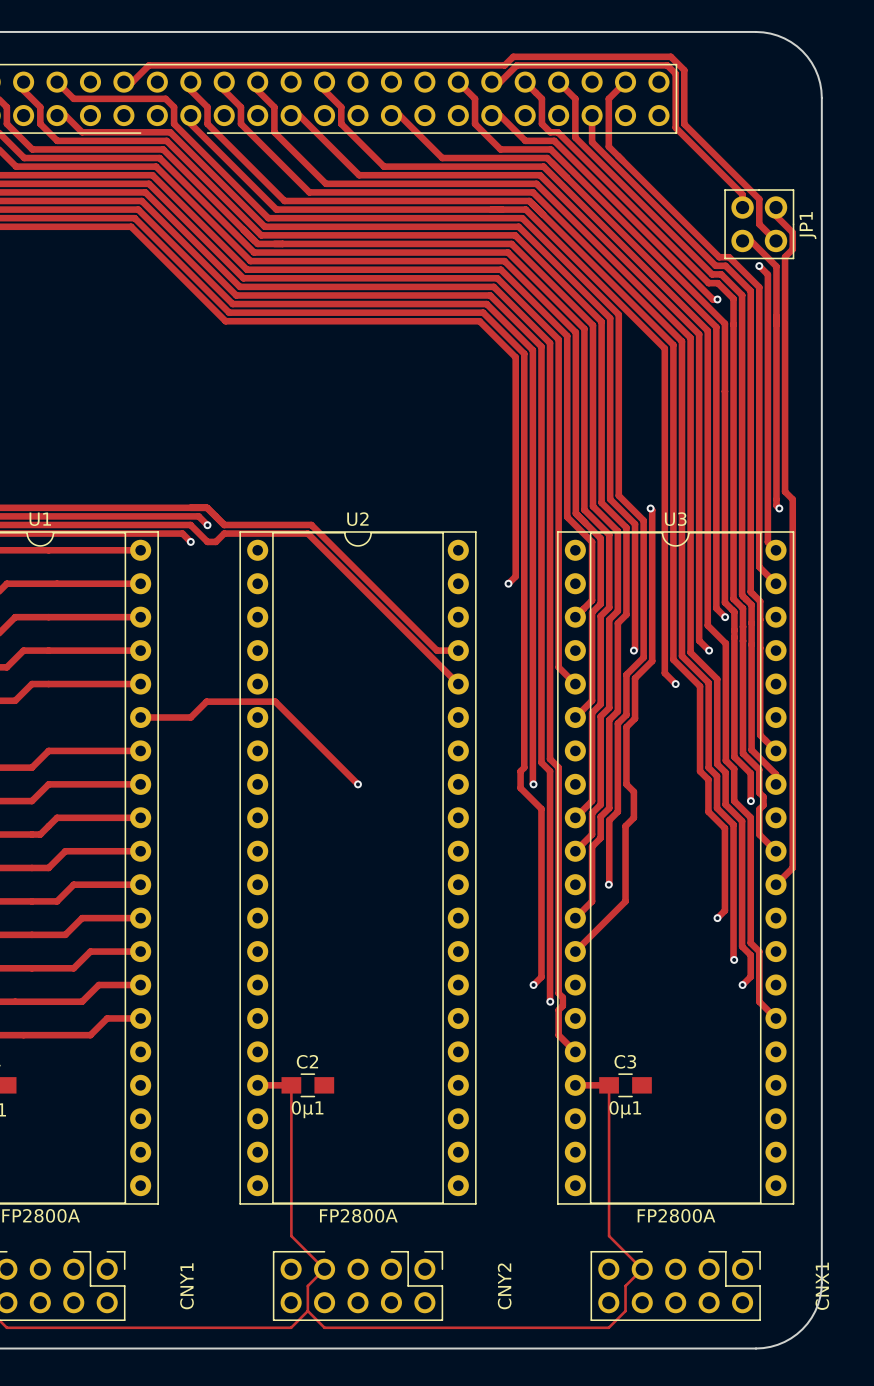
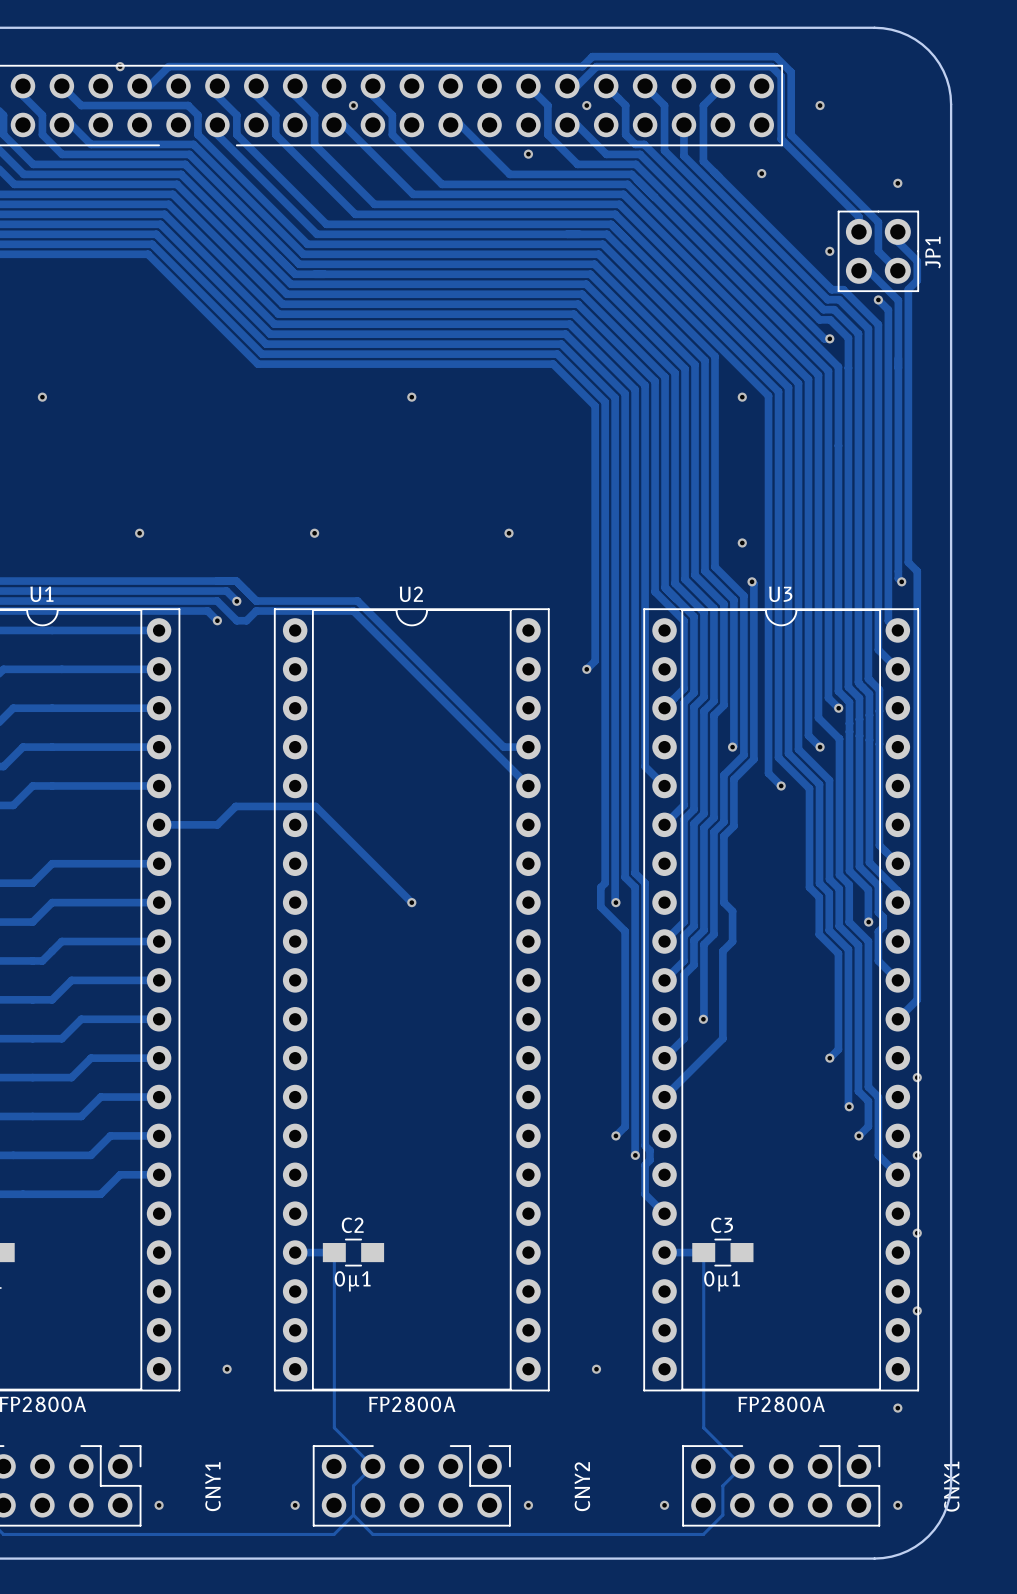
via: none -> (120, 66)
via: none -> (353, 105)
via: none -> (586, 105)
via: none -> (820, 105)
via: none -> (528, 154)
via: none -> (761, 173)
via: none -> (897, 183)
via: none -> (829, 251)
via: none -> (42, 397)
via: none -> (411, 397)
via: none -> (742, 397)
via: none -> (139, 533)
via: none -> (314, 533)
via: none -> (509, 533)
via: none -> (742, 542)
via: none -> (917, 1077)
via: none -> (917, 1155)
via: none -> (917, 1233)
via: none -> (917, 1310)
via: none -> (227, 1369)
via: none -> (596, 1369)
via: none -> (897, 1408)
via: none -> (159, 1505)
via: none -> (295, 1505)
via: none -> (528, 1505)
via: none -> (664, 1505)
via: none -> (897, 1505)

